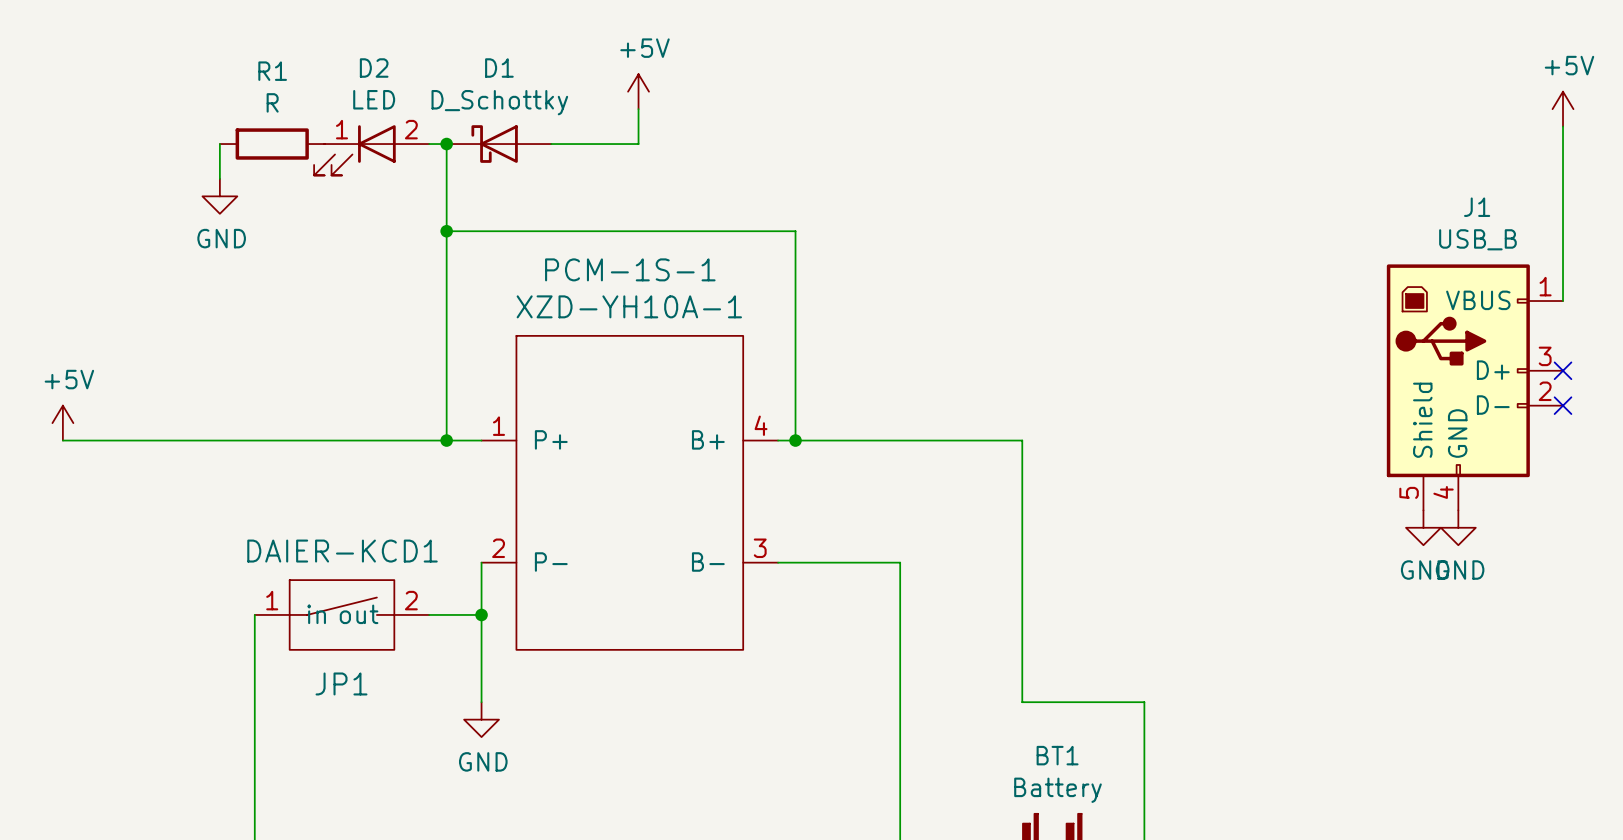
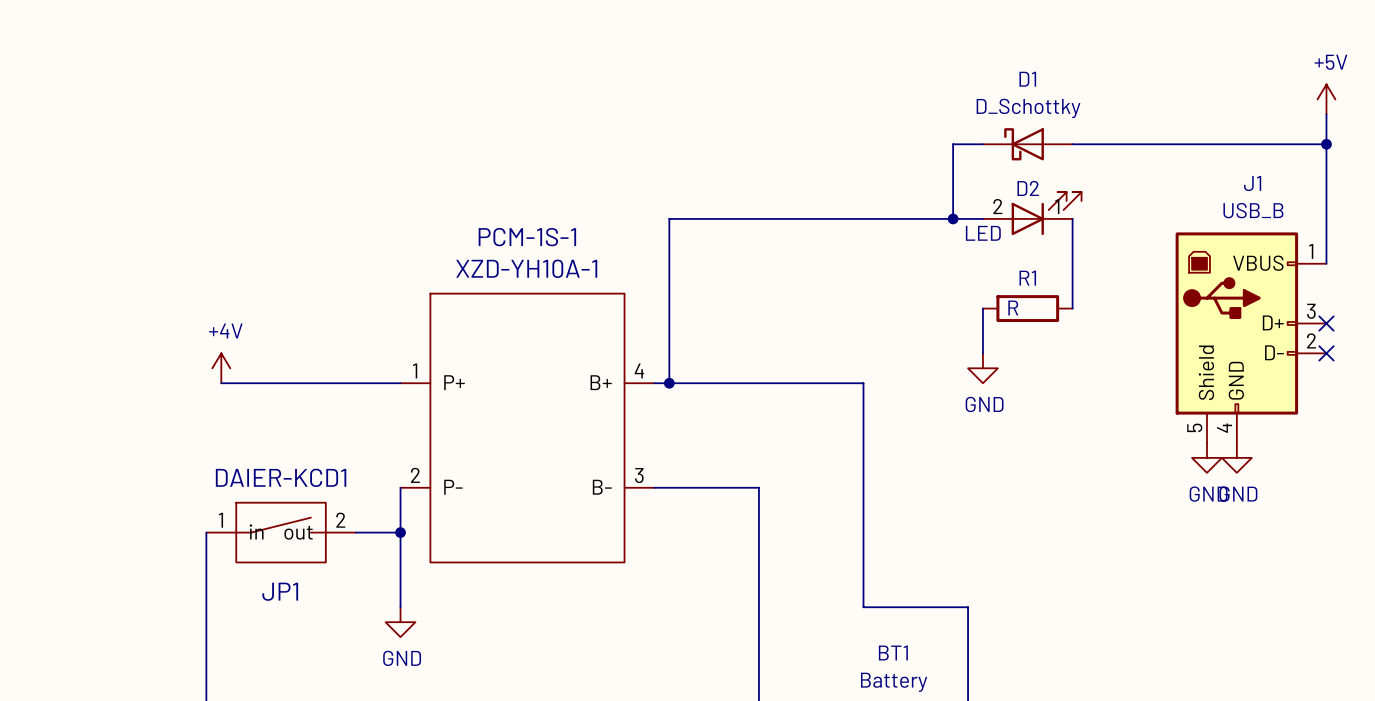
D2 name position: D2 (374, 68) -> D2 (1028, 188)
R1 name position: R1 (272, 71) -> R1 (1027, 278)
power symbol: +5V (638, 91) -> none
D2 value position: LED (374, 99) -> LED (983, 233)
R1 value position: R (272, 102) -> R (1013, 308)
wire: (638, 109) (638, 144) (551, 144) -> none
wire: (219, 144) (219, 178) -> none
R1 position: (272, 144) -> (1027, 308)
wire: (429, 144) (446, 144) (446, 440) -> none
junction: (446, 144) -> none
D1 position: (498, 144) -> (1027, 144)
D2 rotation: 0° (354, 150) -> 180° (1046, 213)
D2 position: (371, 150) -> (1032, 213)
wire: none -> (982, 144) (953, 144) (953, 218)
wire: none -> (1072, 144) (1326, 144)
junction: none -> (1326, 144)
power symbol: GND (219, 196) -> none
wire: (446, 231) (795, 231) (795, 248) -> (982, 218) (669, 218)
junction: (446, 231) -> none
junction: none -> (953, 218)
wire: none -> (1072, 218) (1072, 308)
wire: none -> (982, 308) (982, 353)
power symbol: +5V (62, 423) -> none
power symbol: none -> +4V (221, 368)
power symbol: none -> GND (982, 368)
wire: (62, 440) (272, 440) -> none
junction: (446, 440) -> none

